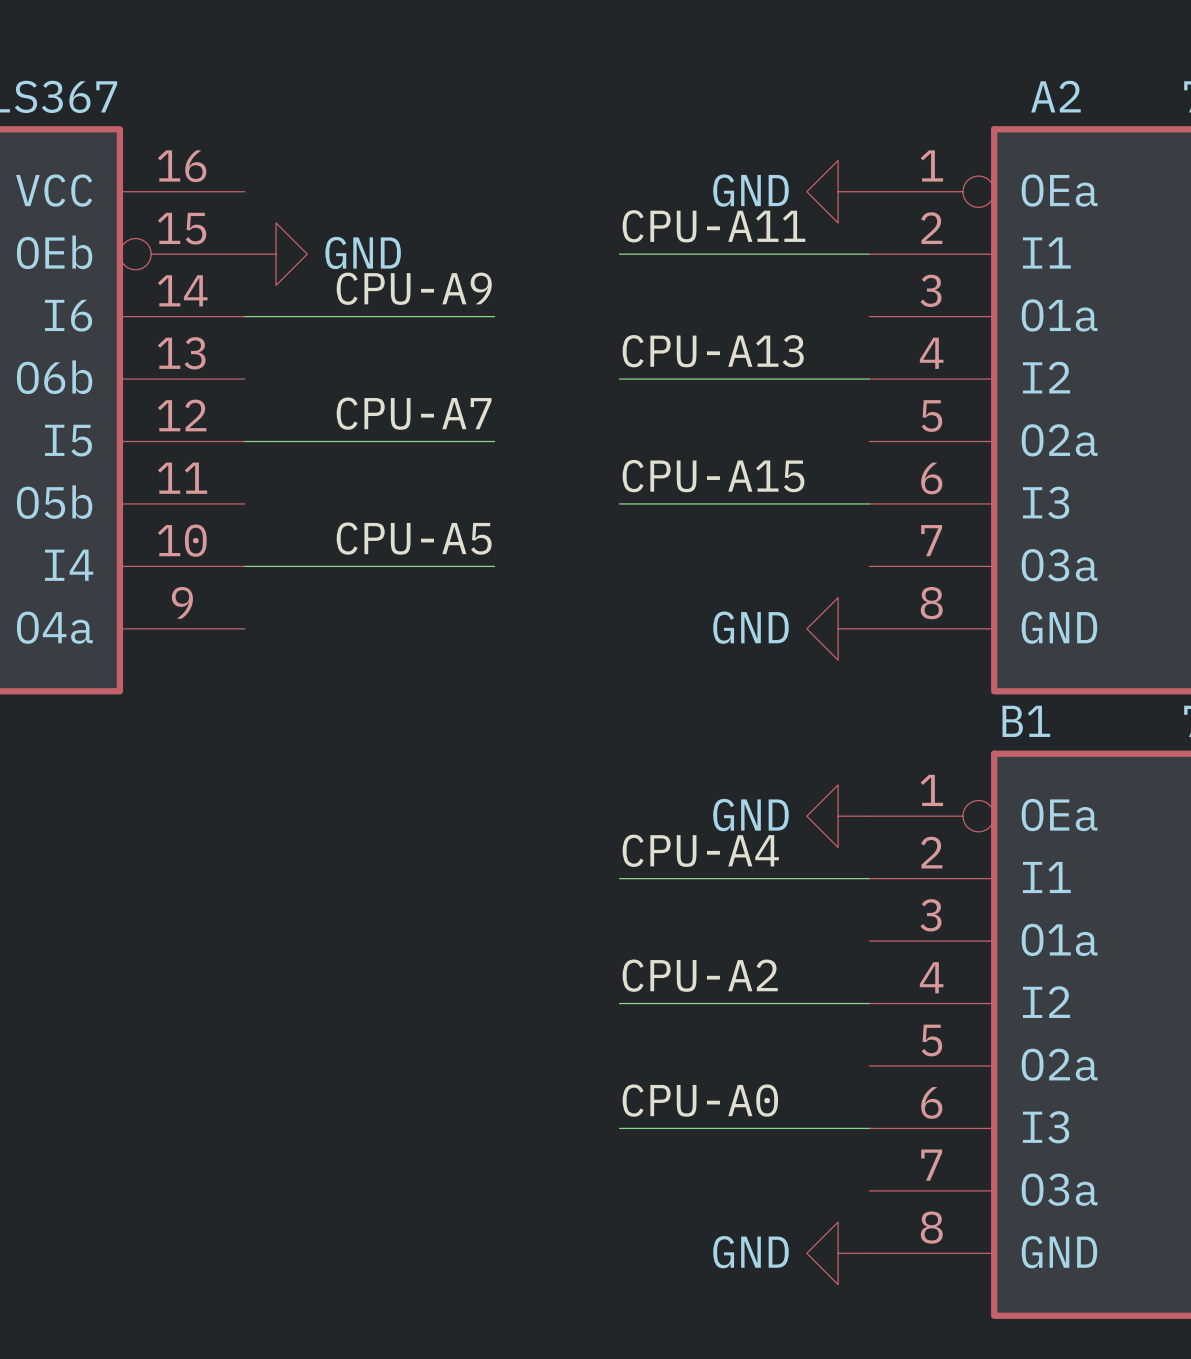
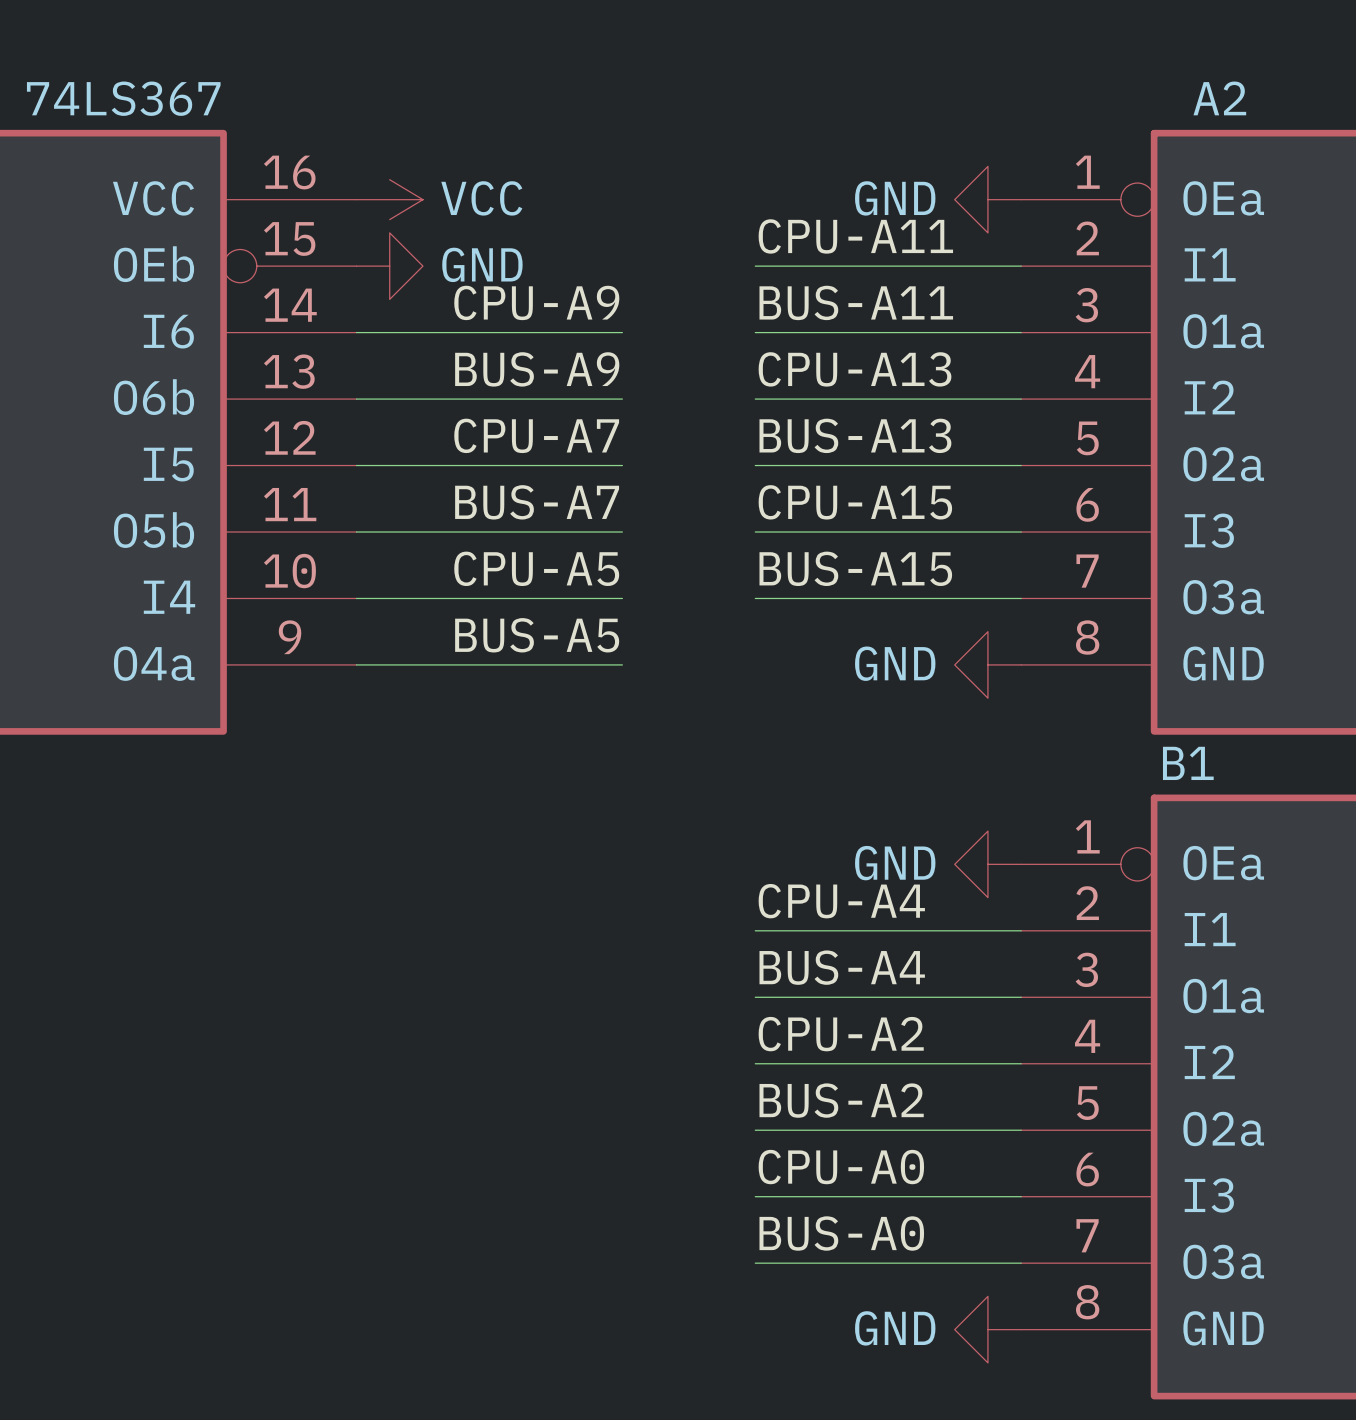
power symbol: none -> VCC (389, 199)
label: none -> BUS-A11 (856, 302)
wire: none -> (755, 332) (1021, 332)
label: none -> BUS-A9 (537, 369)
wire: none -> (356, 399) (622, 399)
label: none -> BUS-A13 (855, 435)
wire: none -> (755, 465) (1021, 465)
label: none -> BUS-A7 (537, 502)
wire: none -> (356, 532) (622, 532)
label: none -> BUS-A15 (855, 568)
wire: none -> (755, 598) (1021, 598)
label: none -> BUS-A5 (537, 635)
wire: none -> (356, 664) (622, 664)
label: none -> BUS-A4 (842, 967)
wire: none -> (755, 997) (1021, 997)
label: none -> BUS-A2 (841, 1100)
wire: none -> (755, 1130) (1021, 1130)
label: none -> BUS-A0 (841, 1233)
wire: none -> (755, 1263) (1021, 1263)

